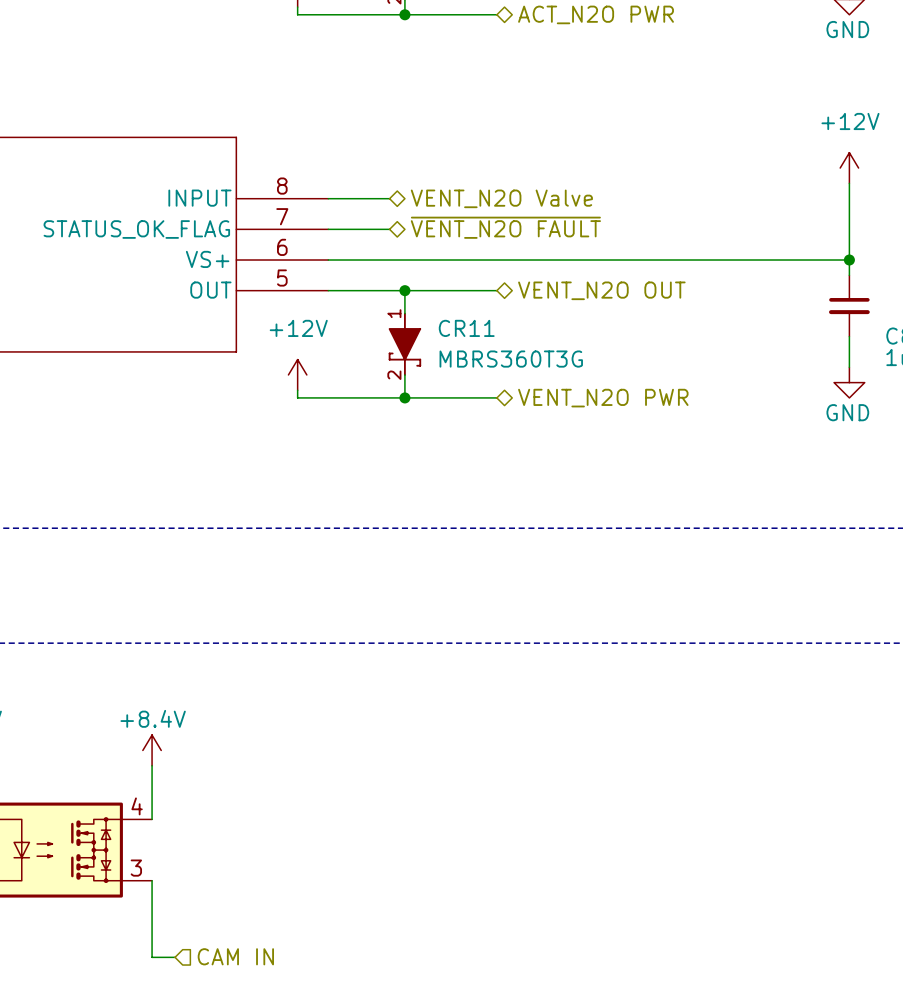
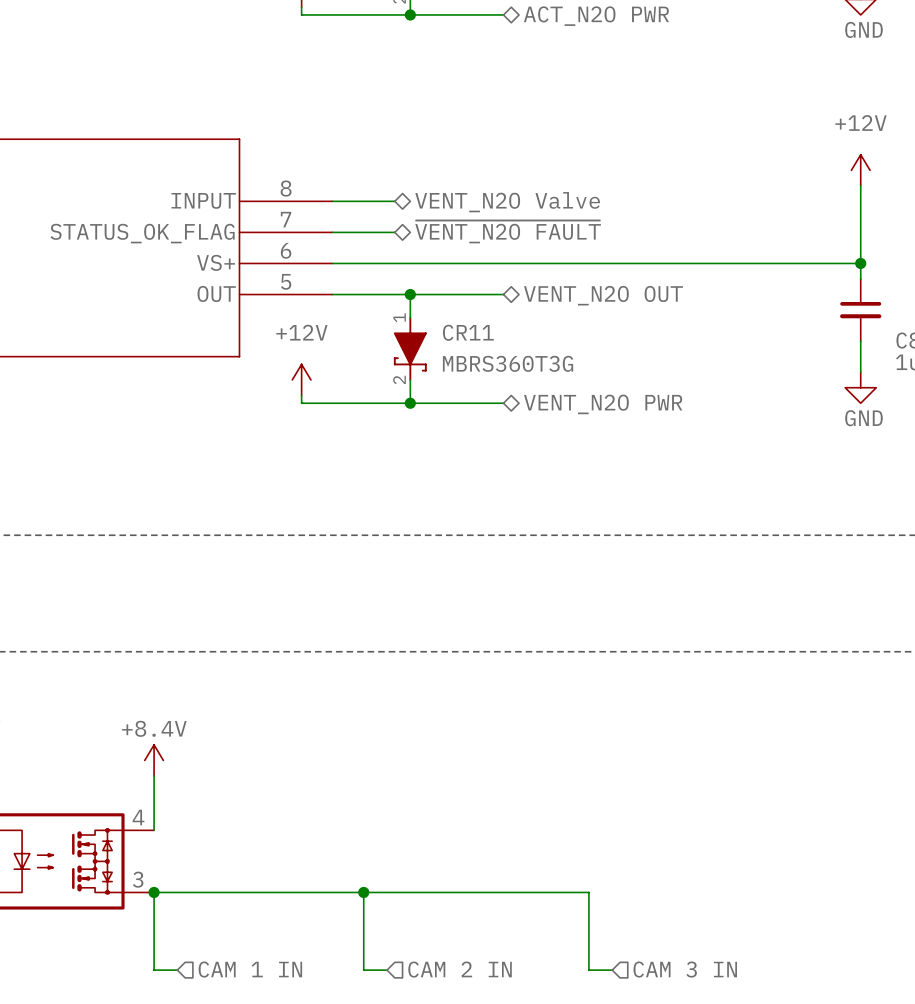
wire: none -> (154, 892) (588, 892) (588, 970) (612, 970)
junction: none -> (154, 892)
wire: none -> (363, 892) (363, 970) (387, 970)
junction: none -> (363, 892)
hierarchical label: CAM IN (235, 956) -> CAM 1 IN (250, 969)
hierarchical label: none -> CAM 2 IN (460, 969)
hierarchical label: none -> CAM 3 IN (685, 969)

